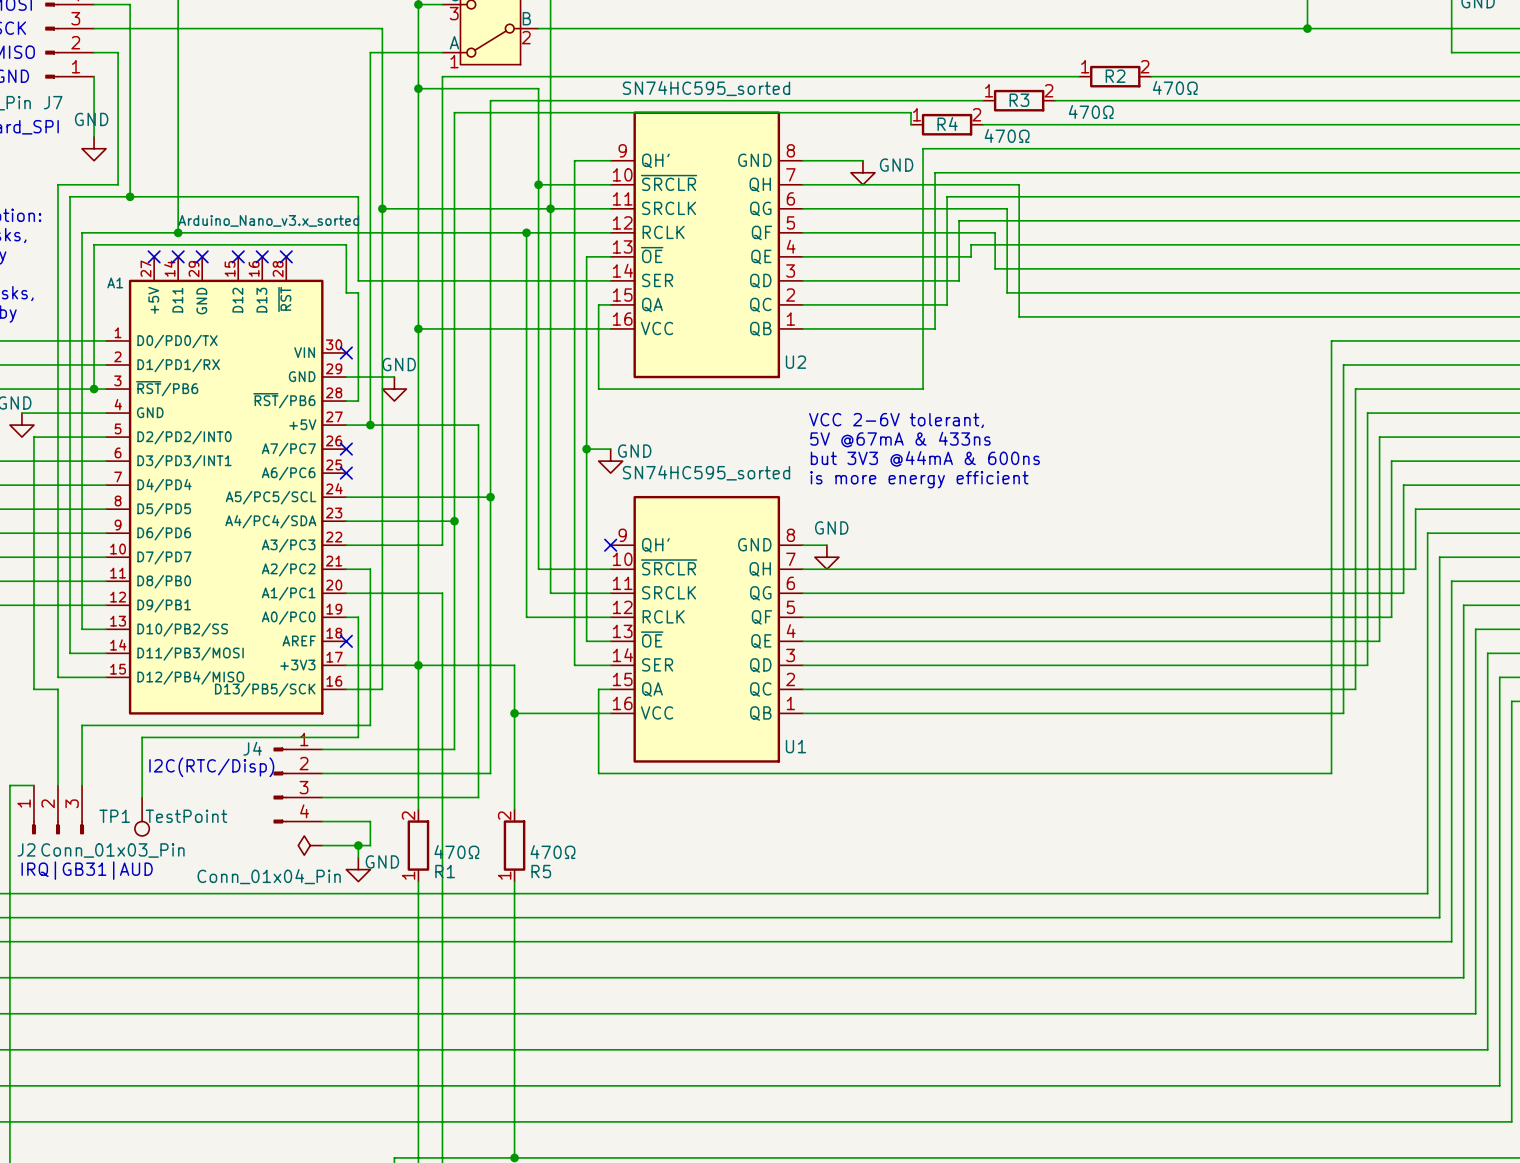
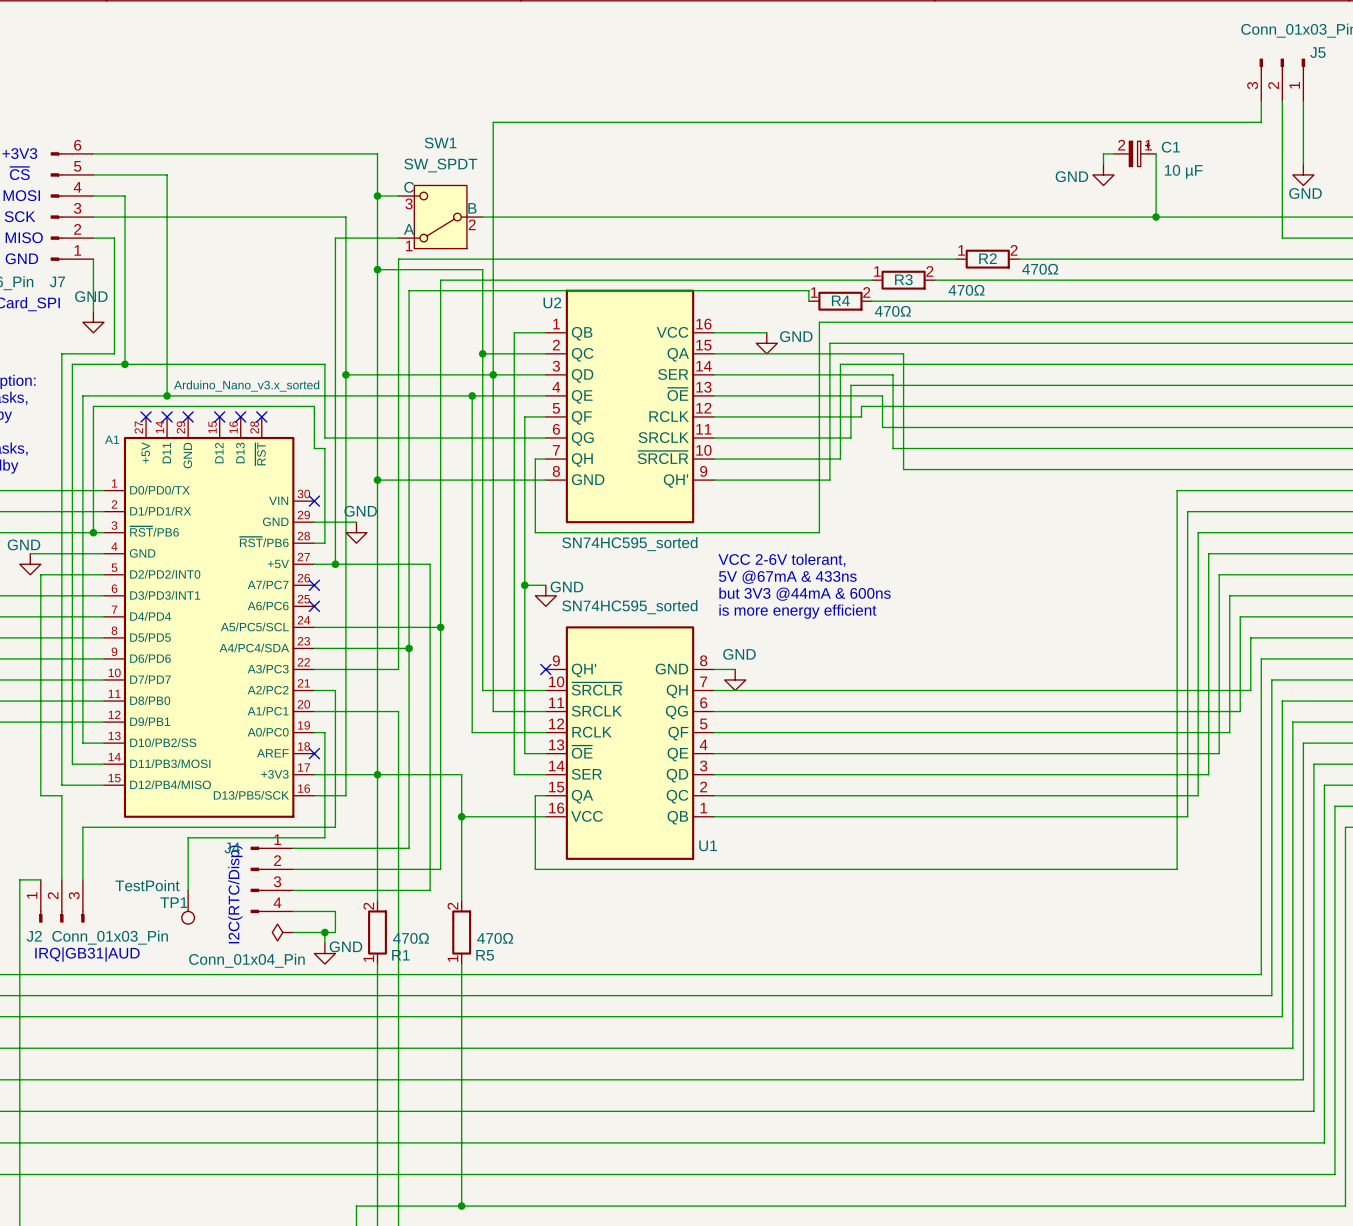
U2 rotation: 0° (706, 244) -> 180° (630, 406)
wire: (202, 737) (142, 737) (142, 797) -> (188, 837) (188, 890)
text rotation: 0° (211, 767) -> 90° counterclockwise (235, 894)
TP1 name position: TP1 (114, 816) -> TP1 (173, 902)
TP1 position: (142, 816) -> (188, 907)
TP1 value position: TestPoint (186, 816) -> TestPoint (147, 885)

